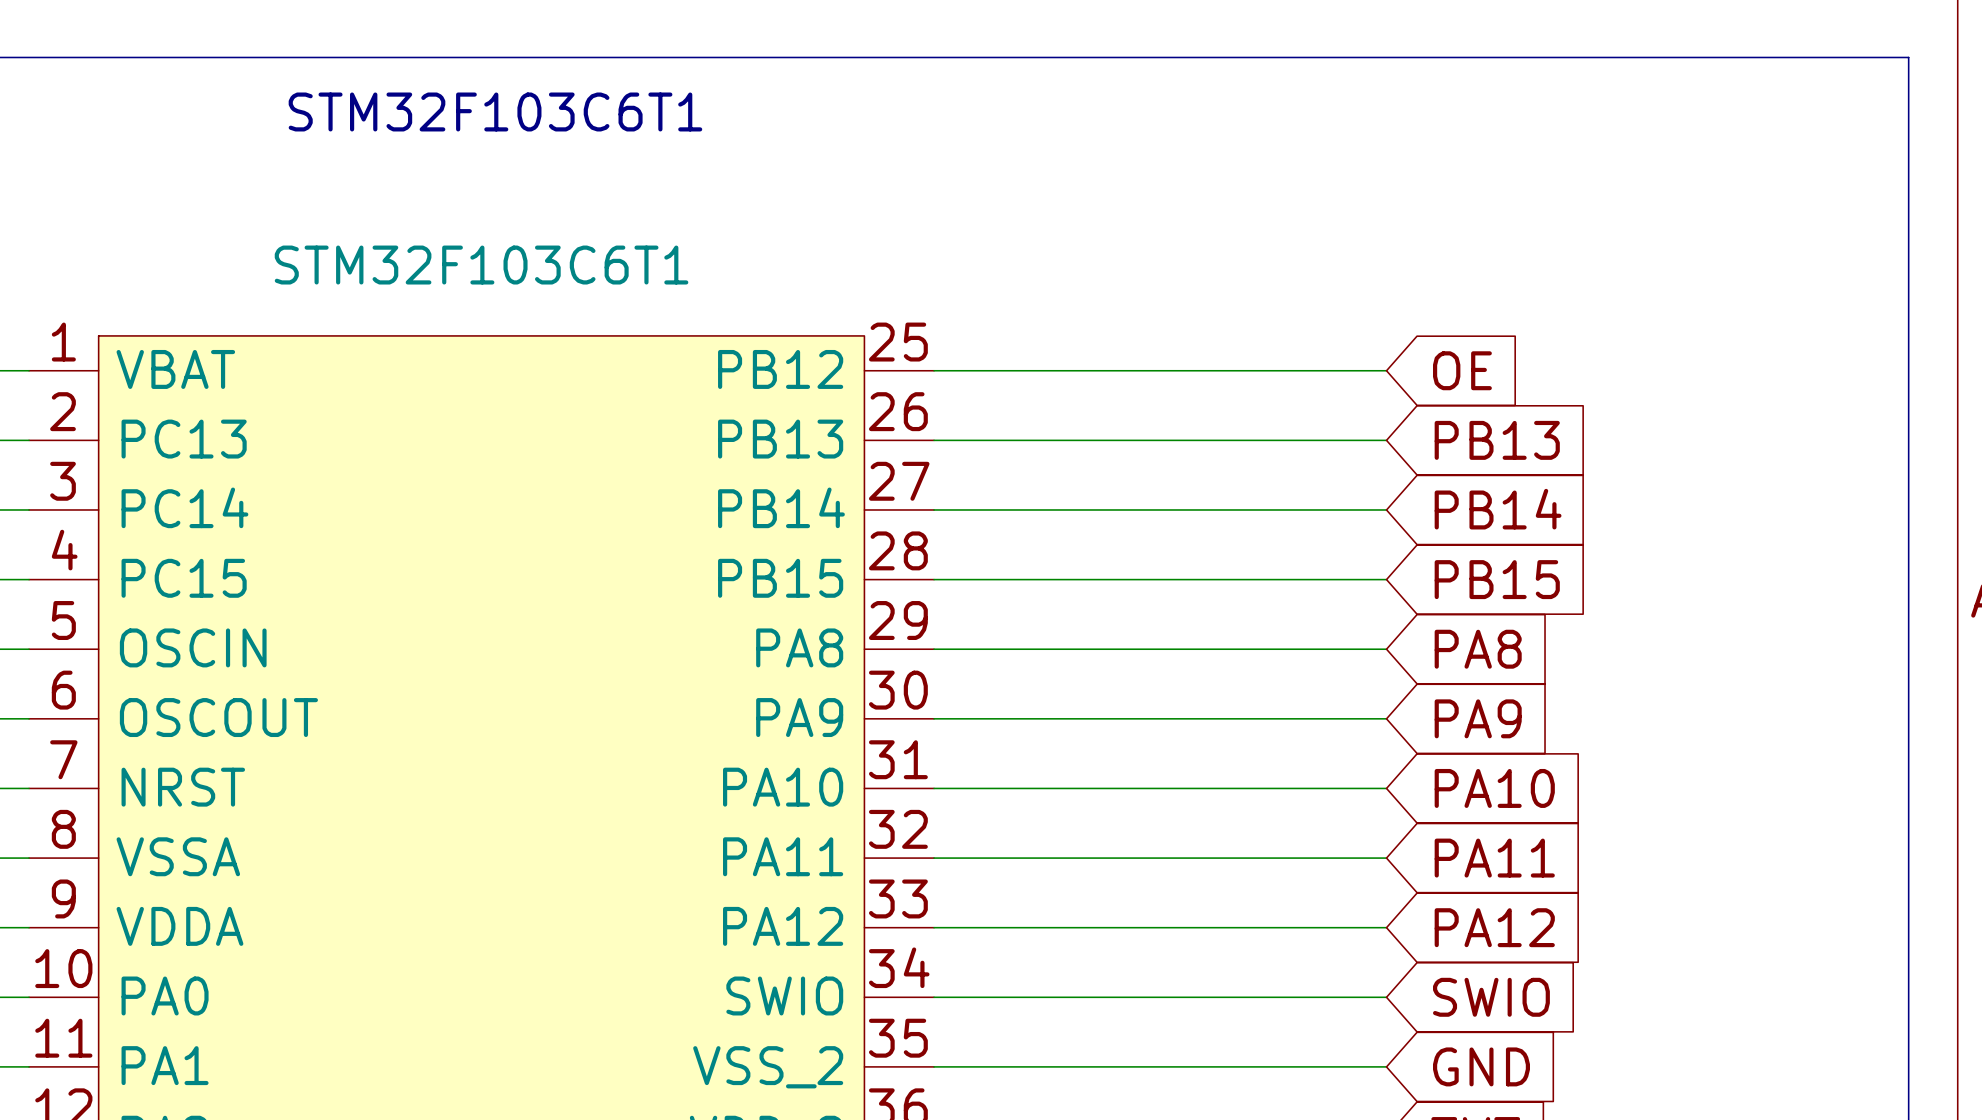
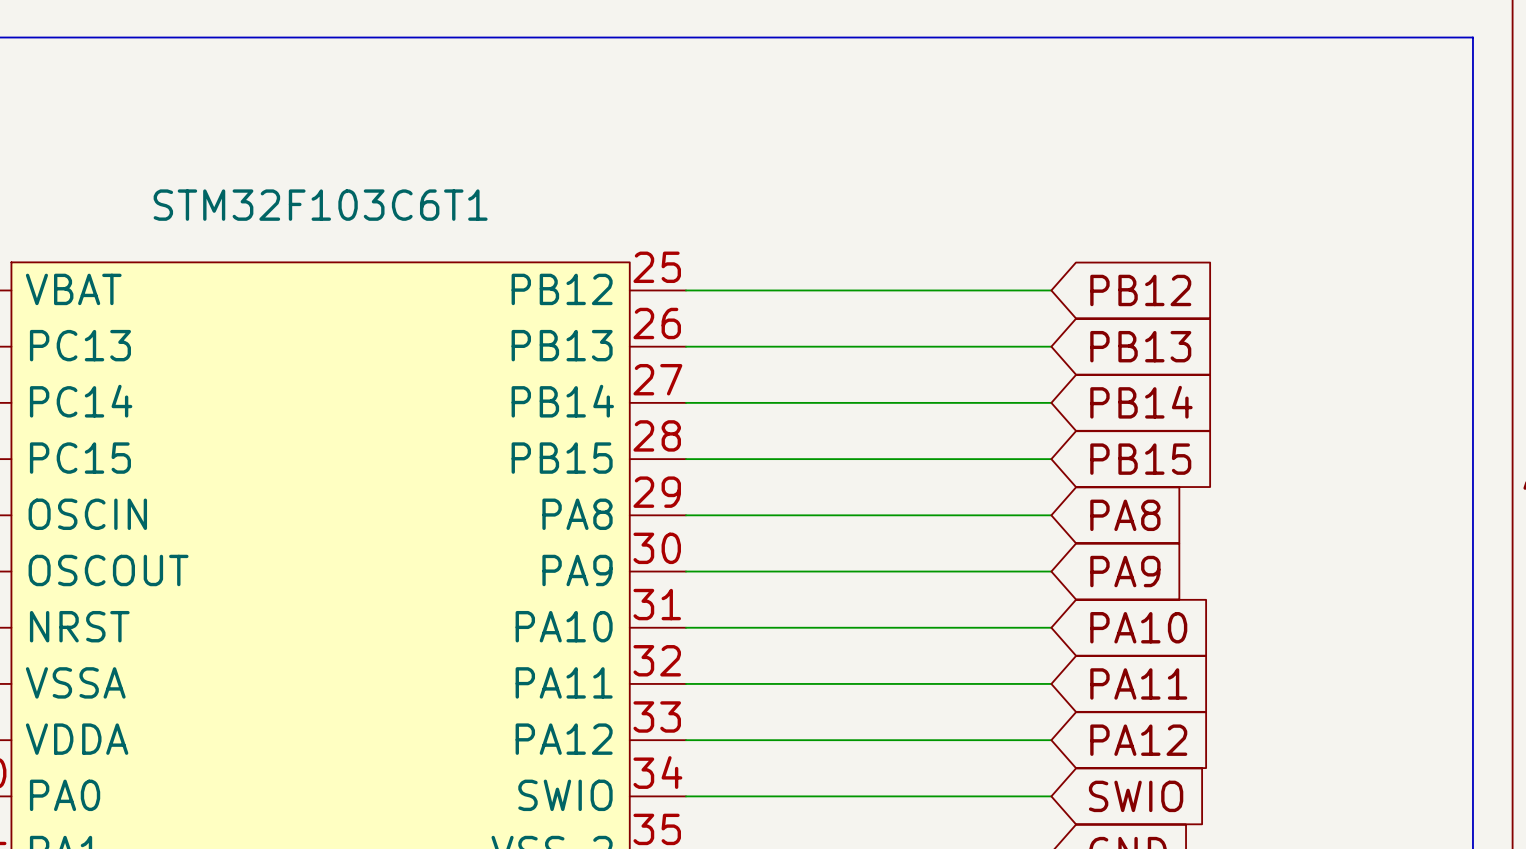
text: STM32F103C6T1 (495, 111) -> none
global label: OE (1462, 370) -> PB12 (1140, 290)

